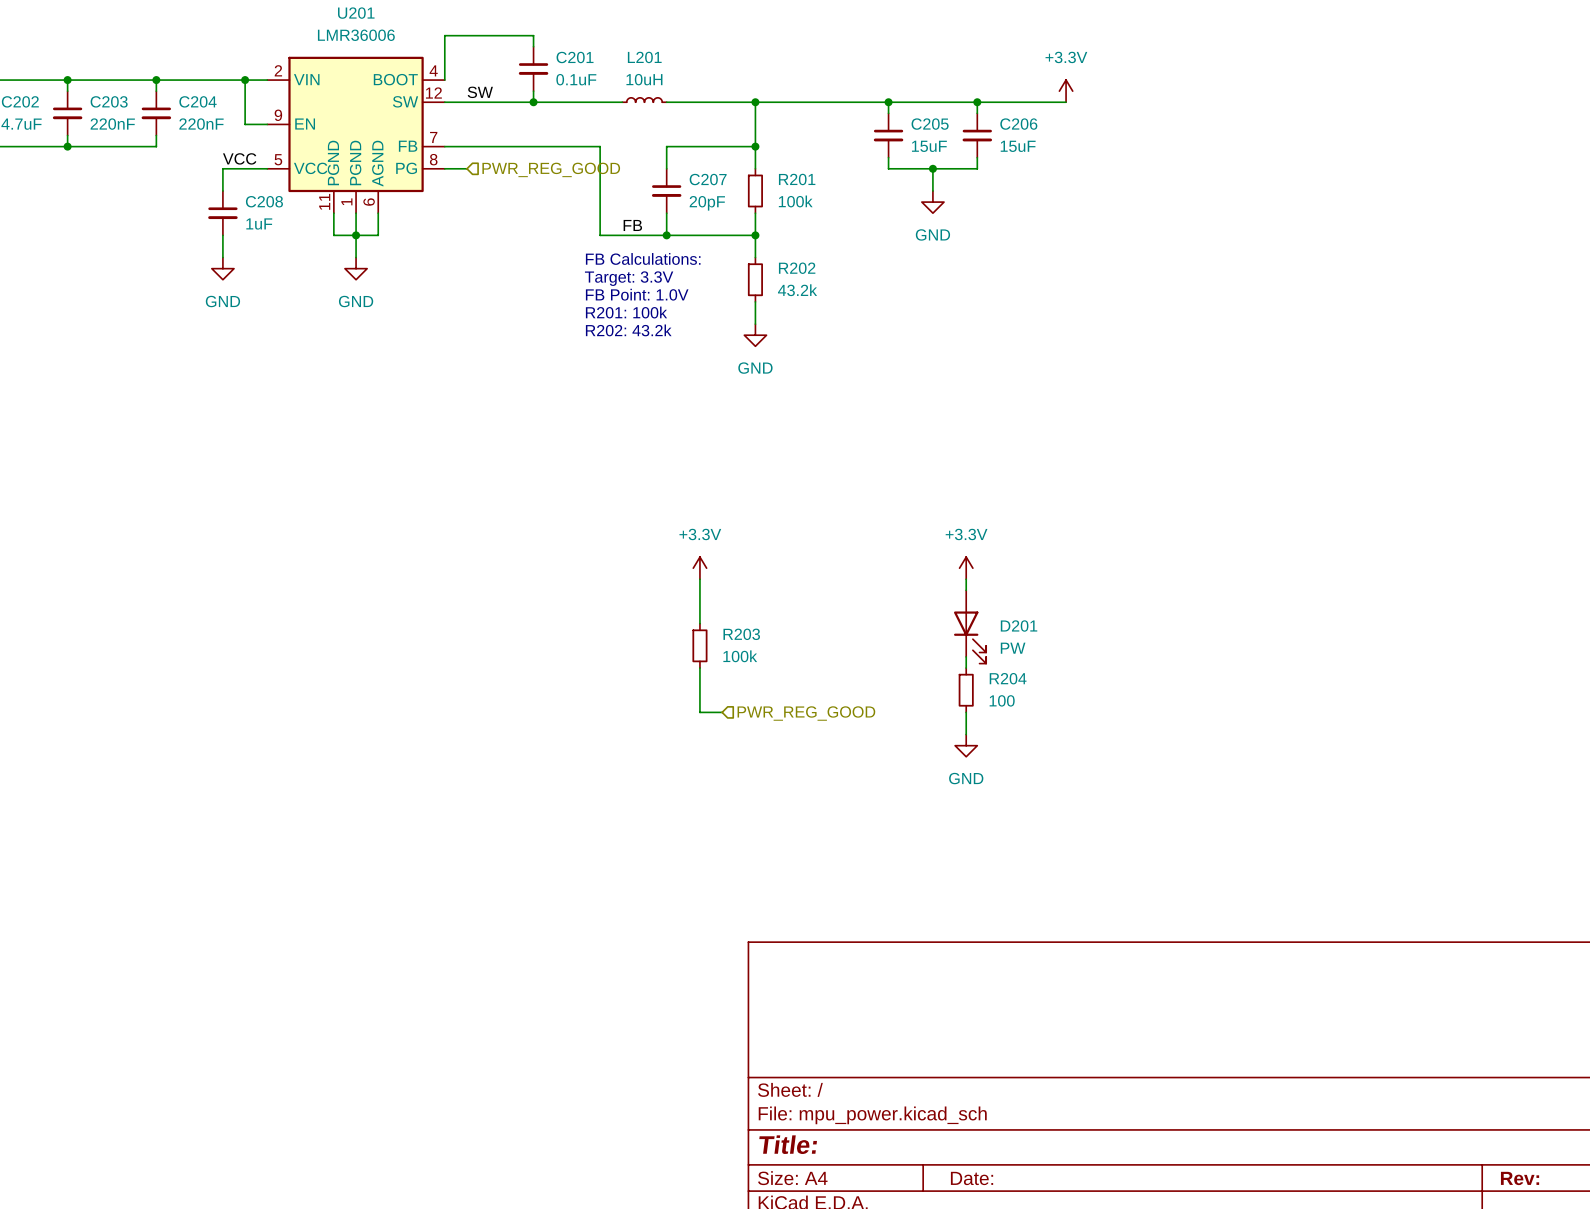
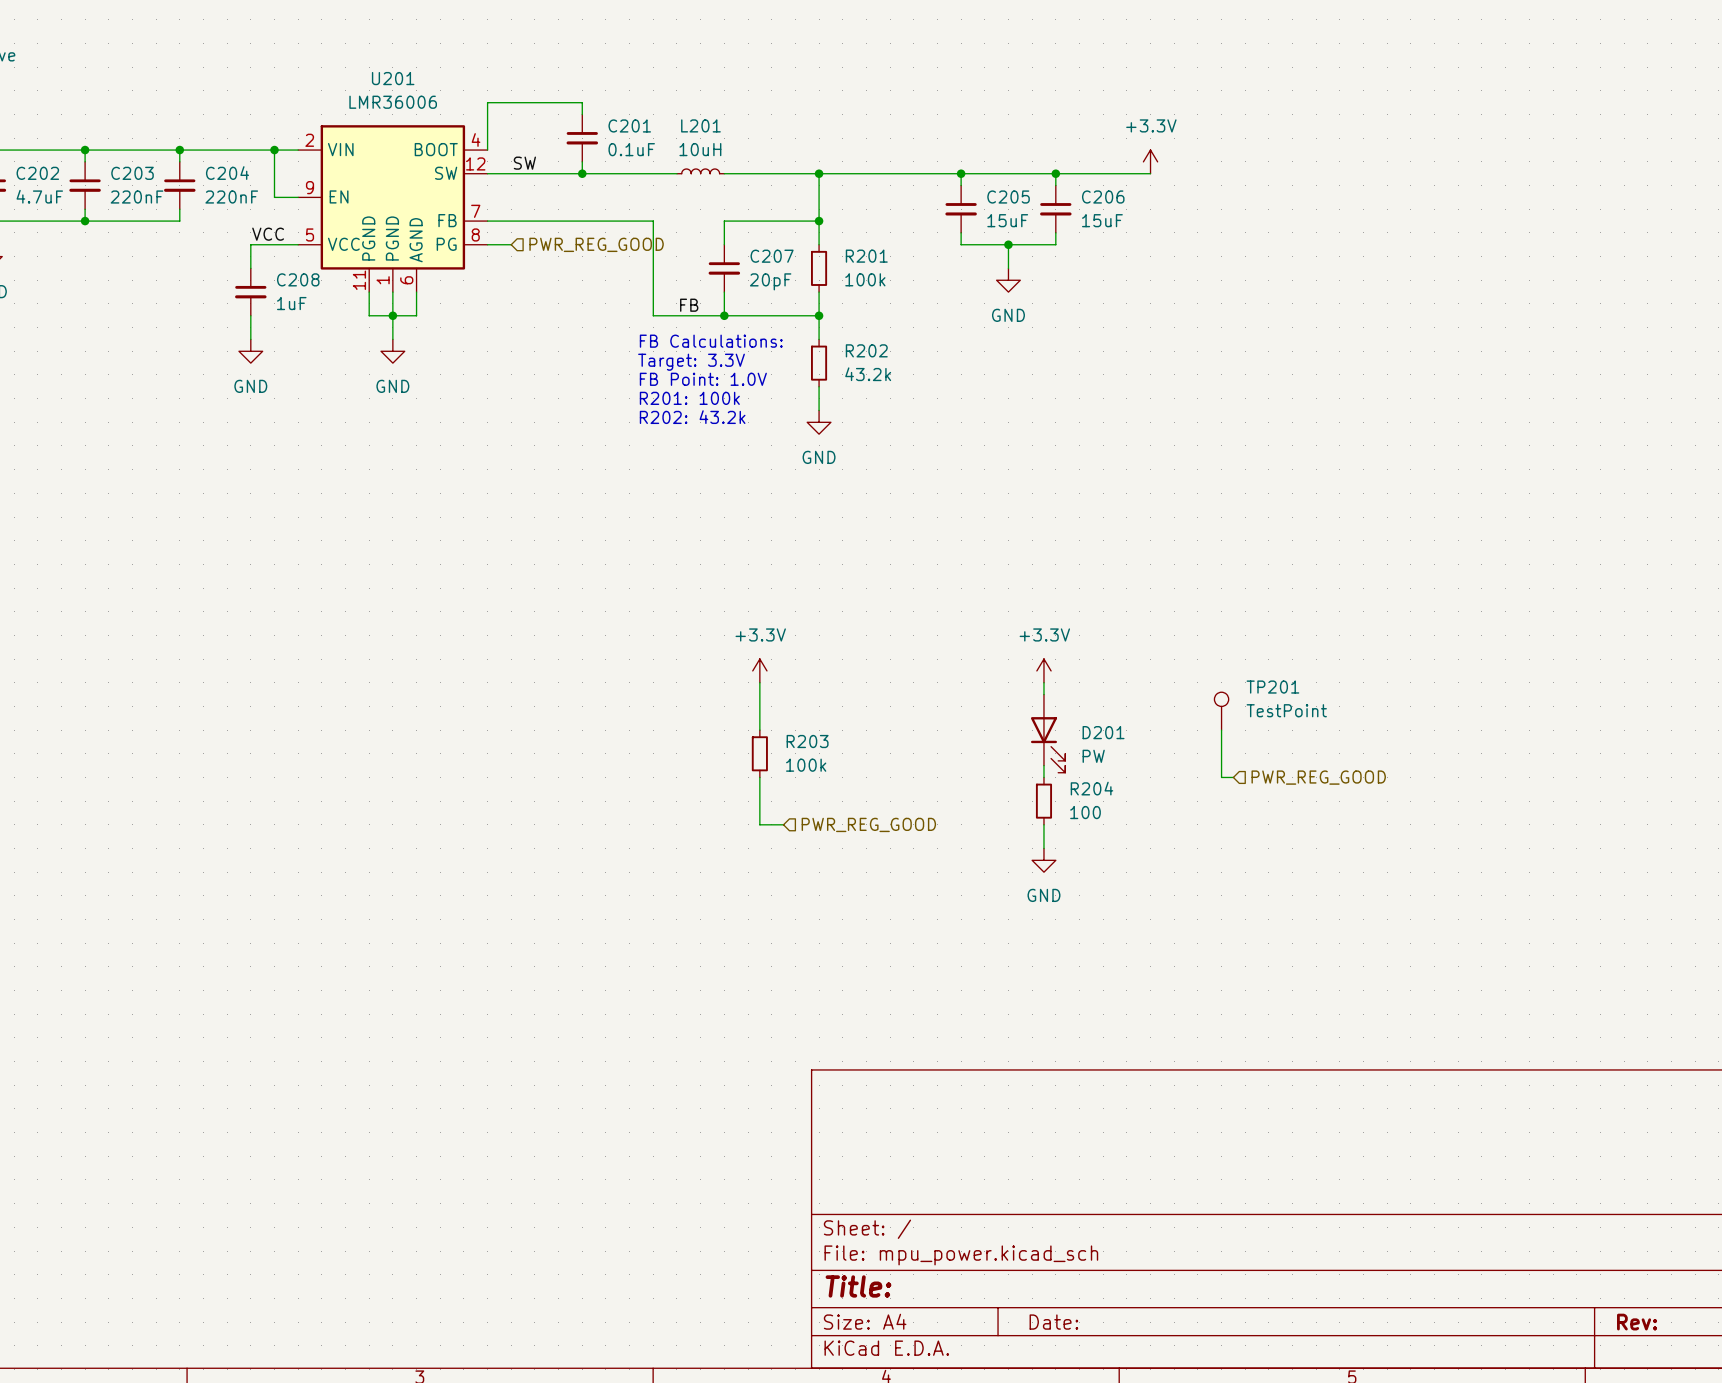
TP201: none -> TestPoint (1221, 711)
wire: none -> (1221, 730) (1221, 777) (1233, 777)
hierarchical label: none -> PWR_REG_GOOD (1318, 777)

